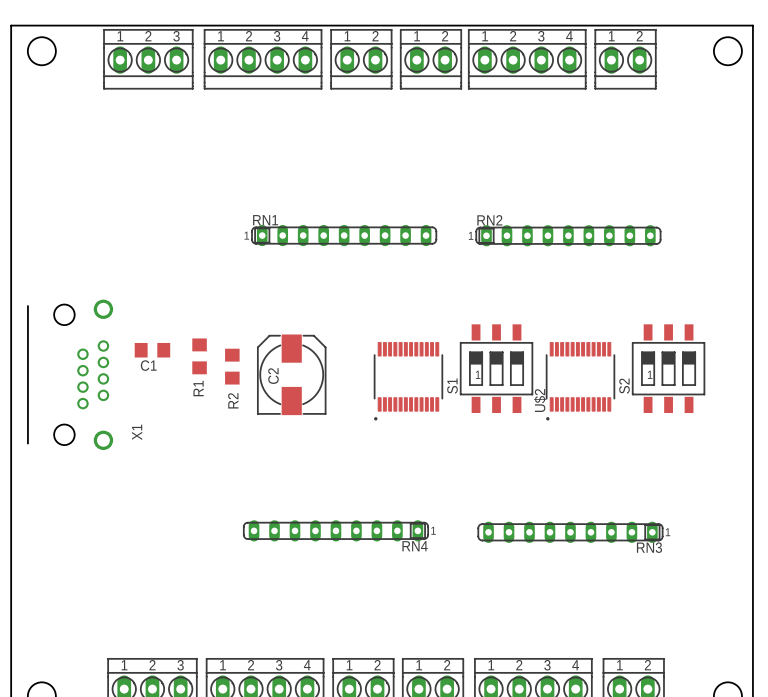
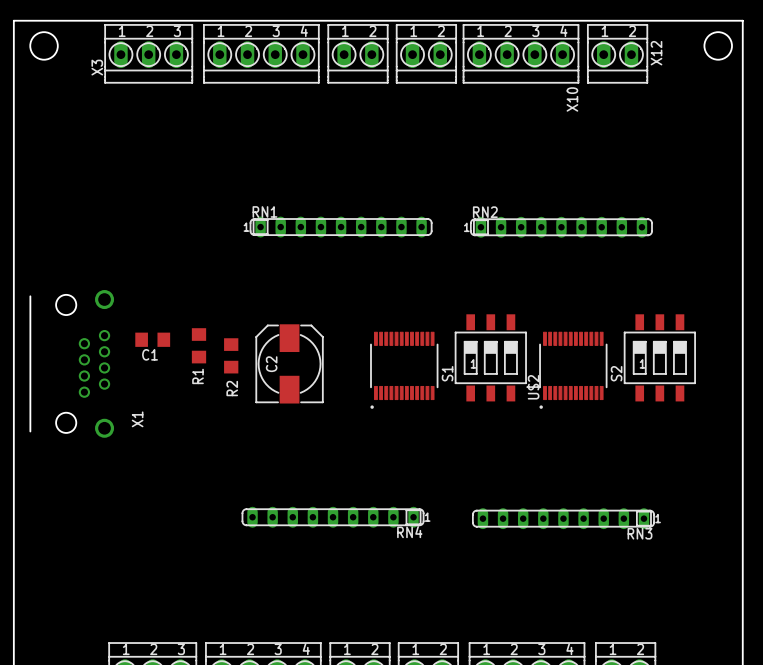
X12 name: none -> X12 (656, 53)
X3 name: none -> X3 (97, 67)
X10 name: none -> X10 (572, 99)

